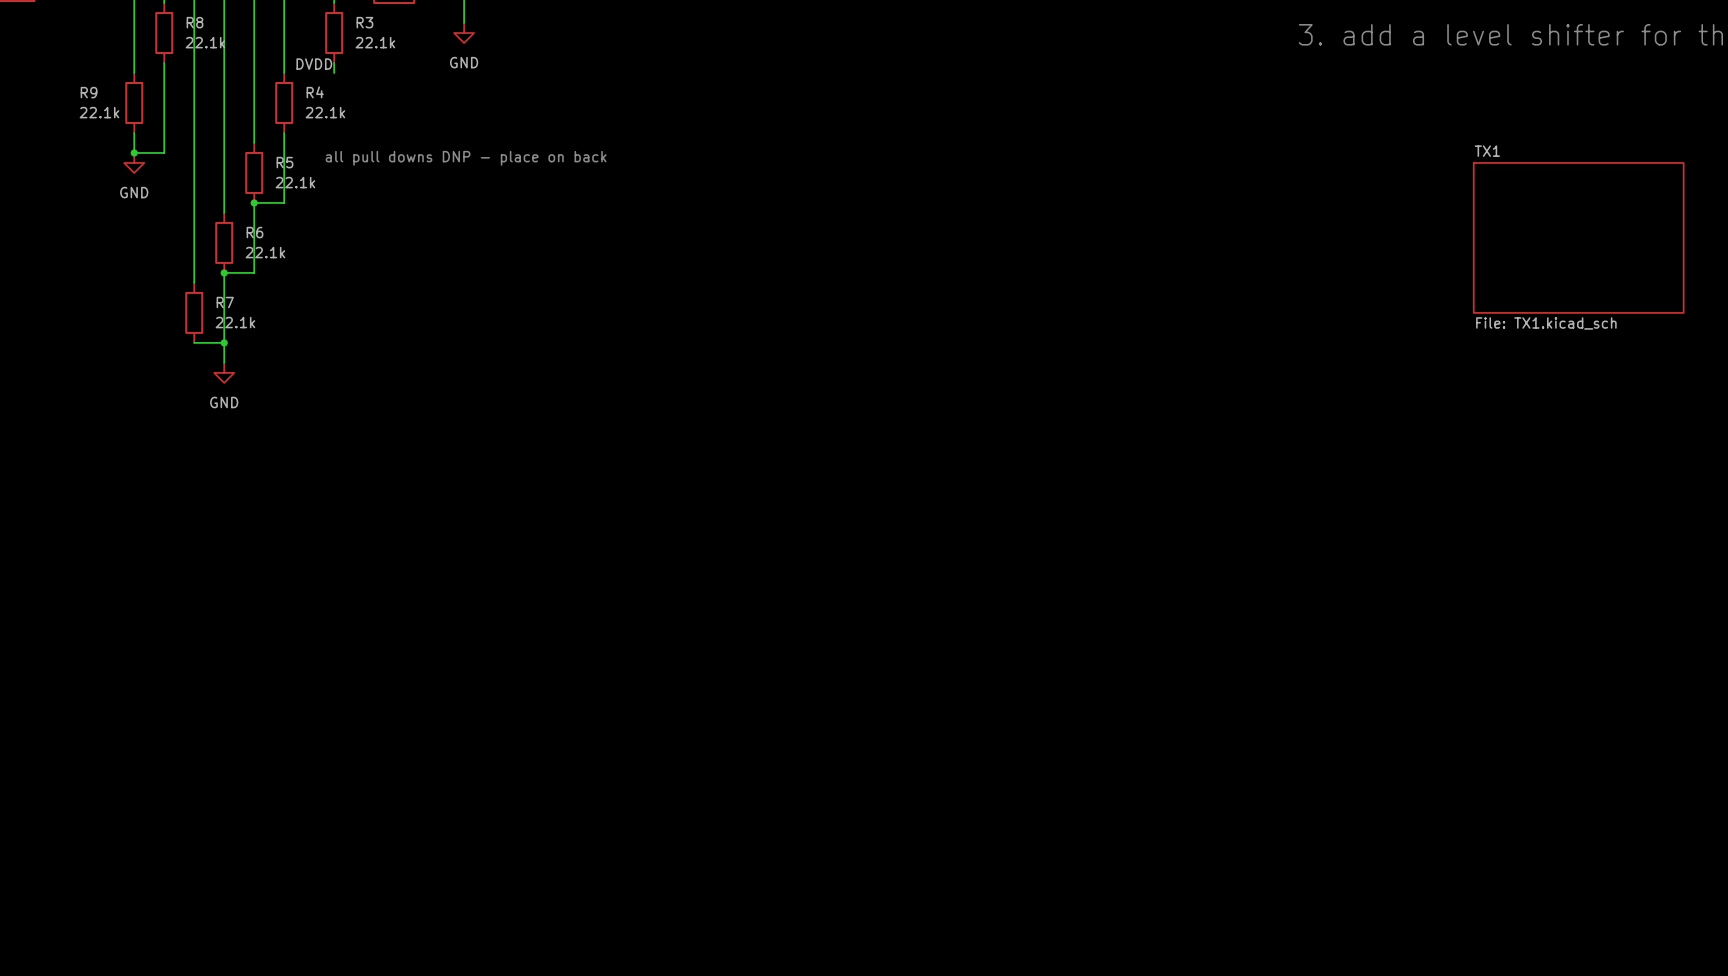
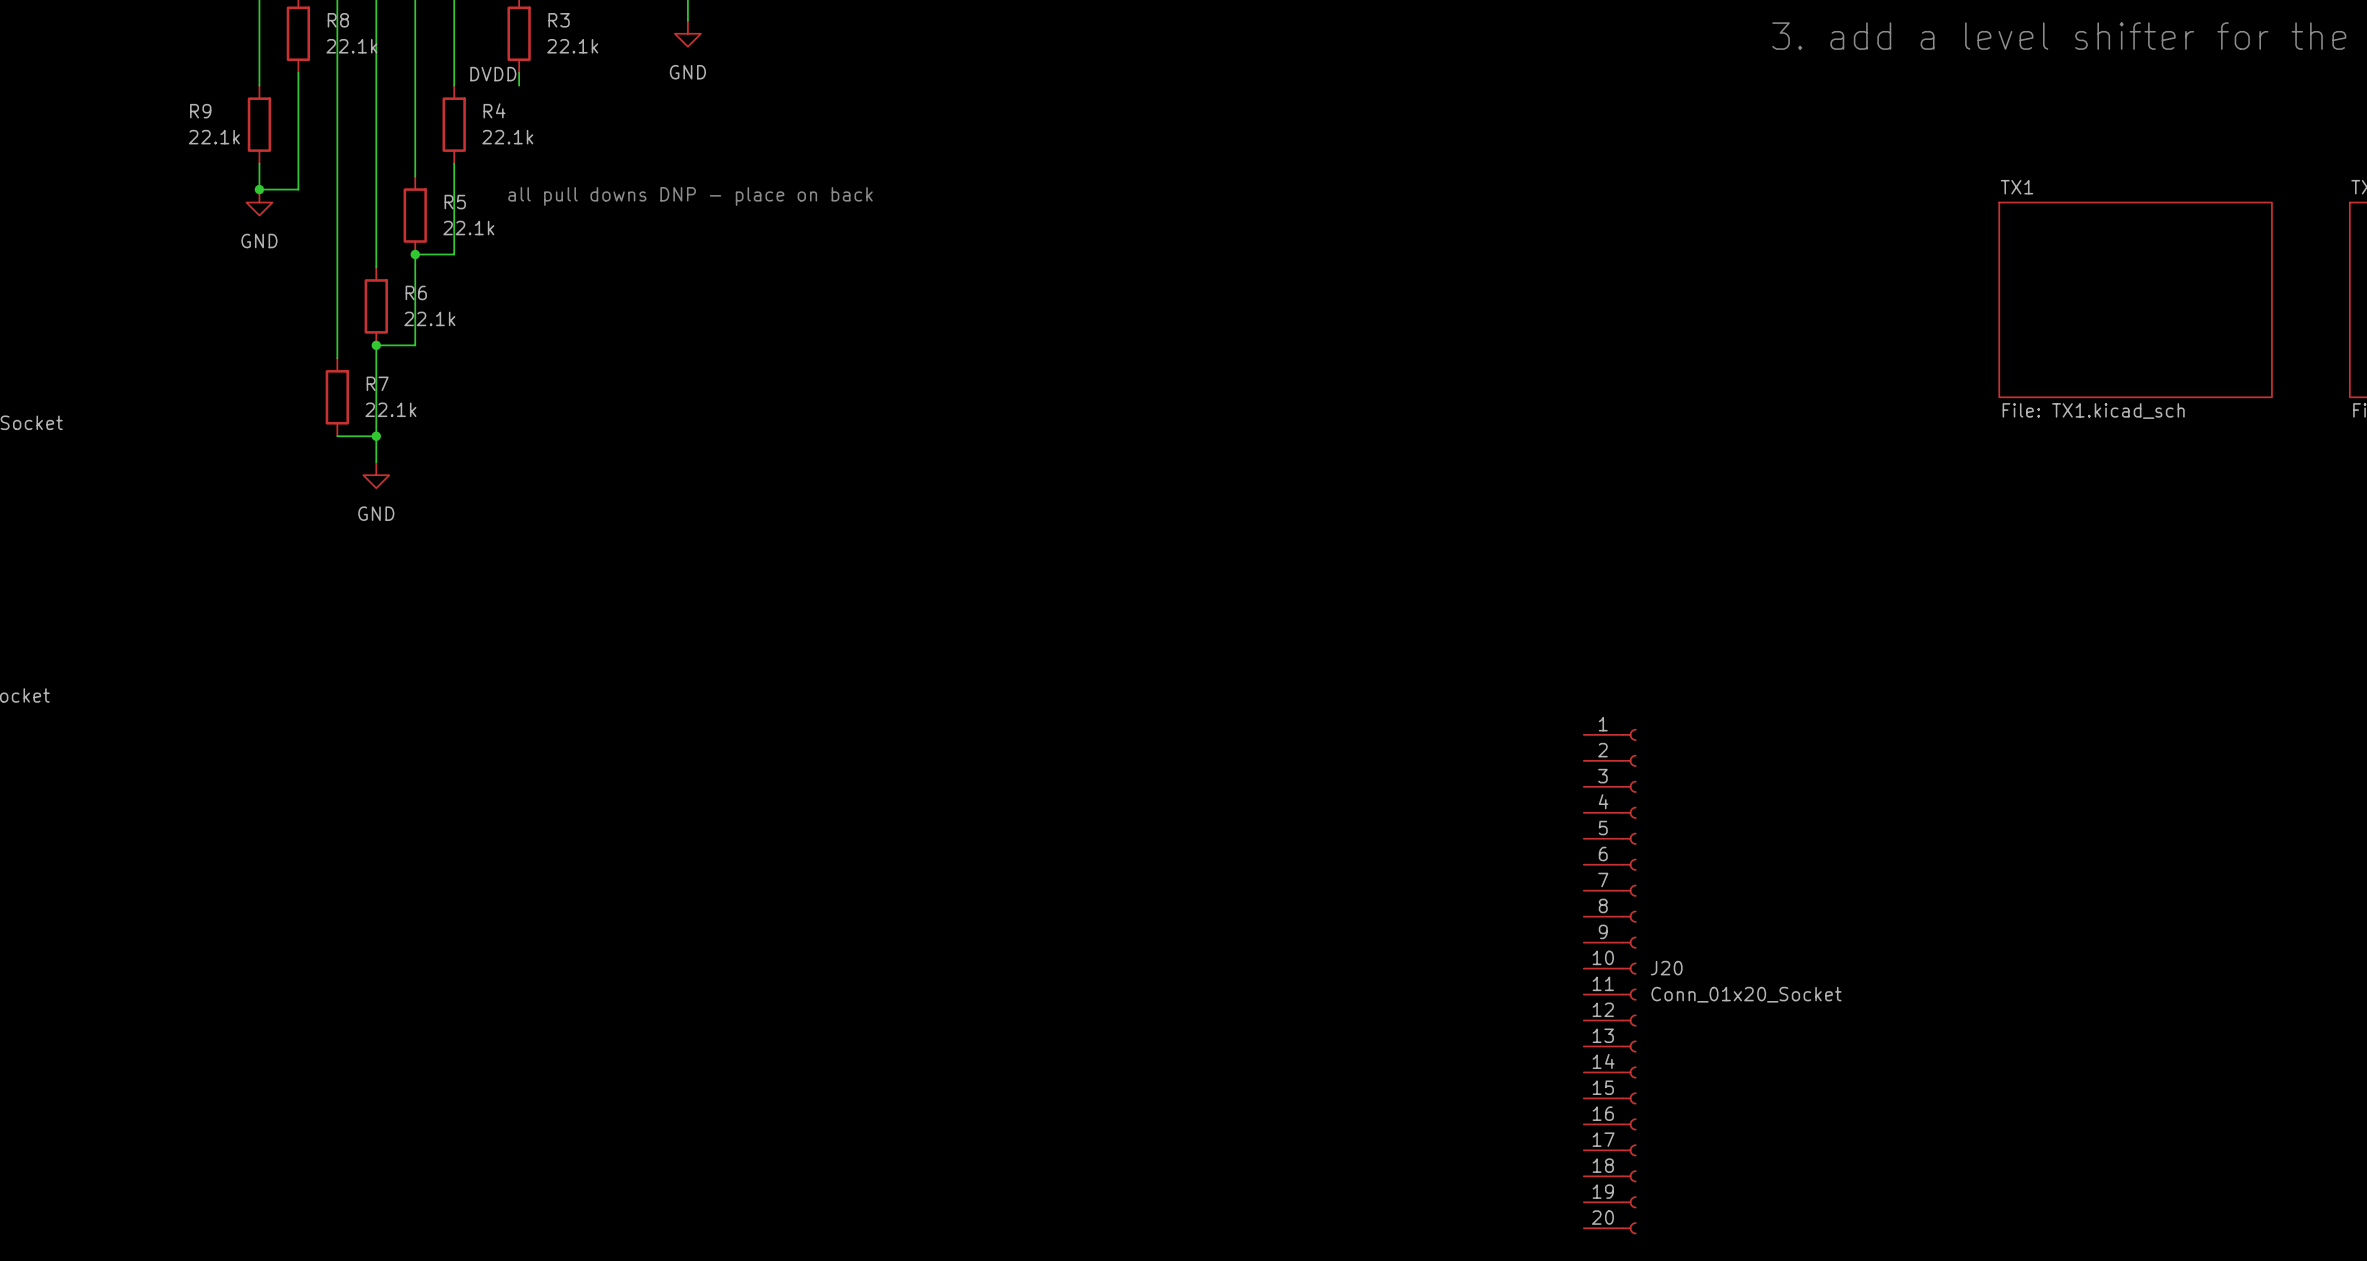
J20: none -> Conn_01x20_Socket (1610, 981)

